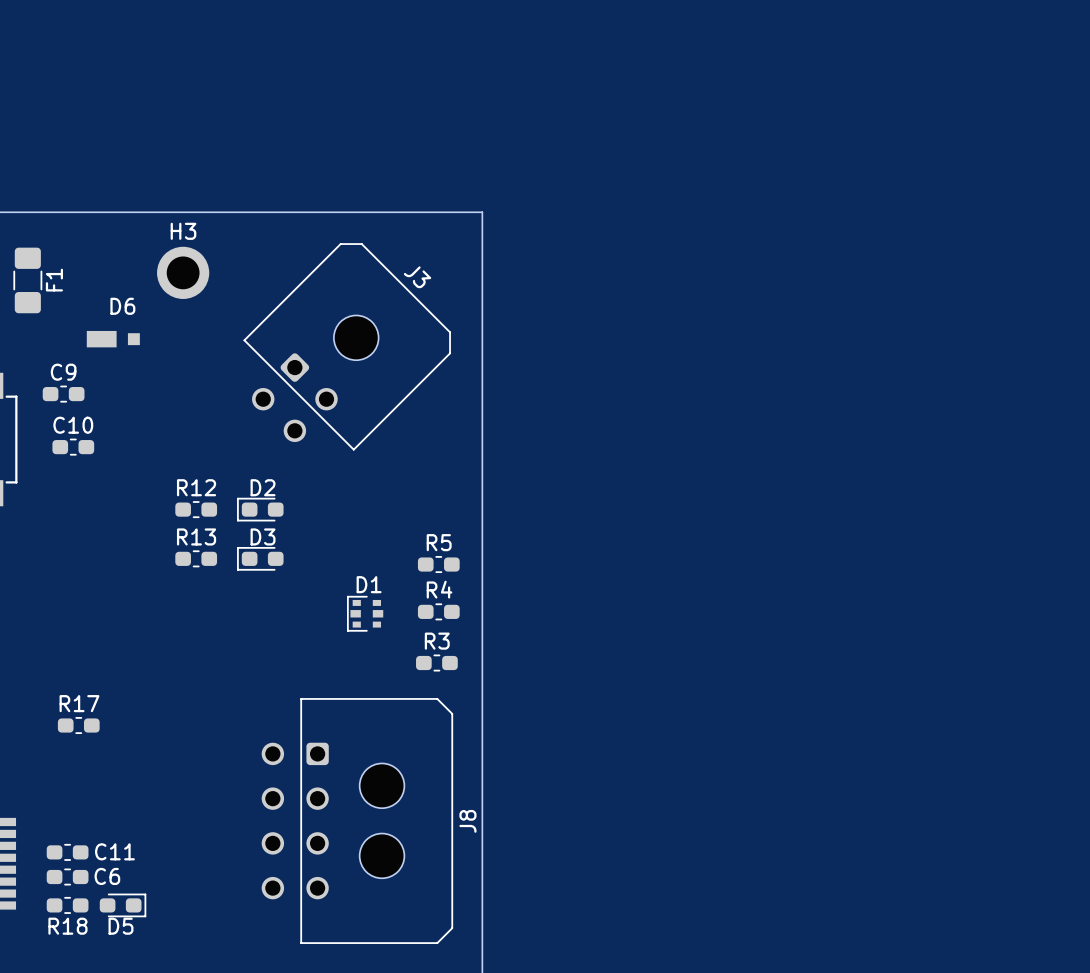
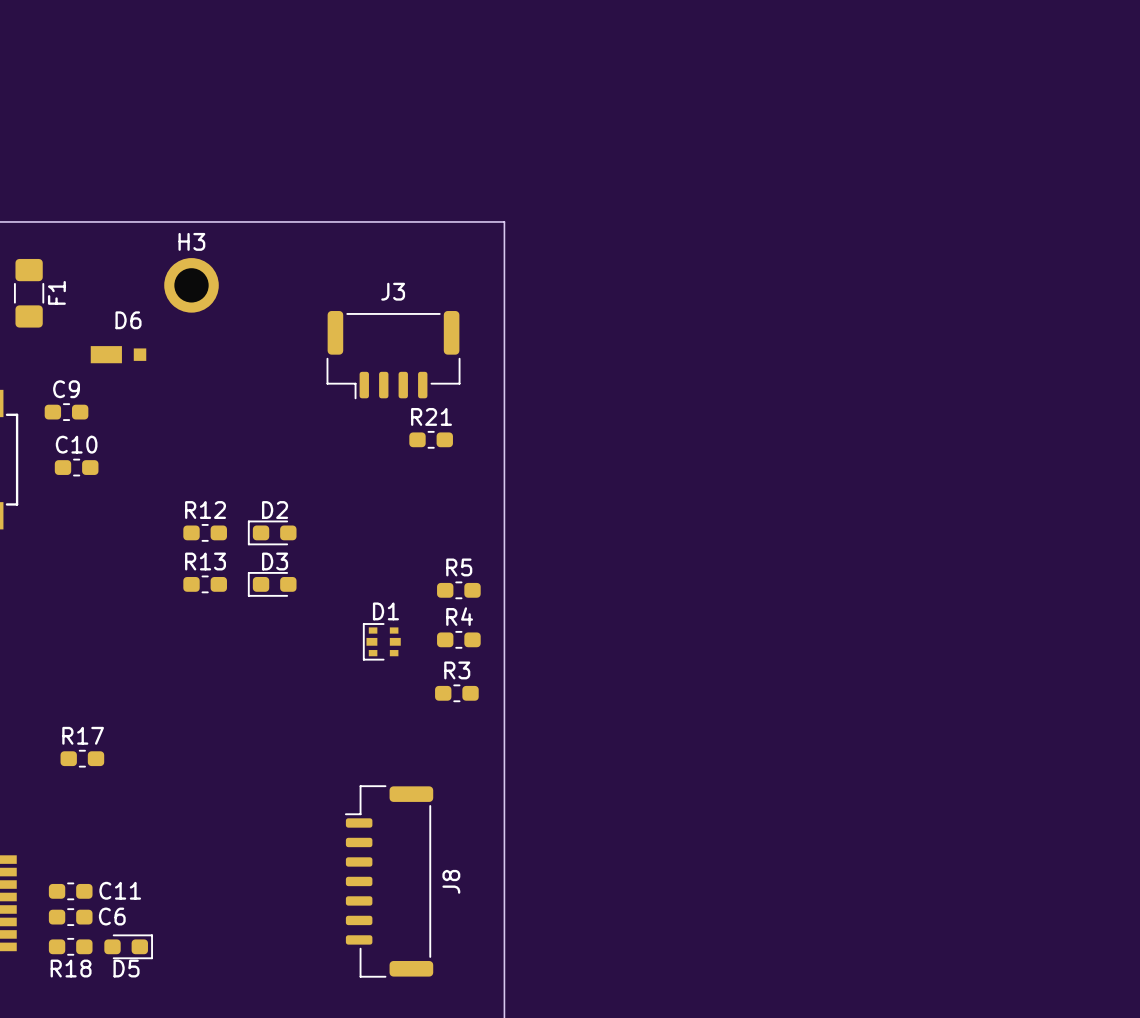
J3 footprint: [243, 243, 451, 451] -> [326, 311, 461, 400]
J3 name position: J3 (417, 277) -> J3 (393, 291)
R21: none -> (431, 439)
J8 footprint: [261, 698, 454, 944] -> [344, 785, 434, 978]
J8 name position: J8 (467, 821) -> J8 (451, 881)

